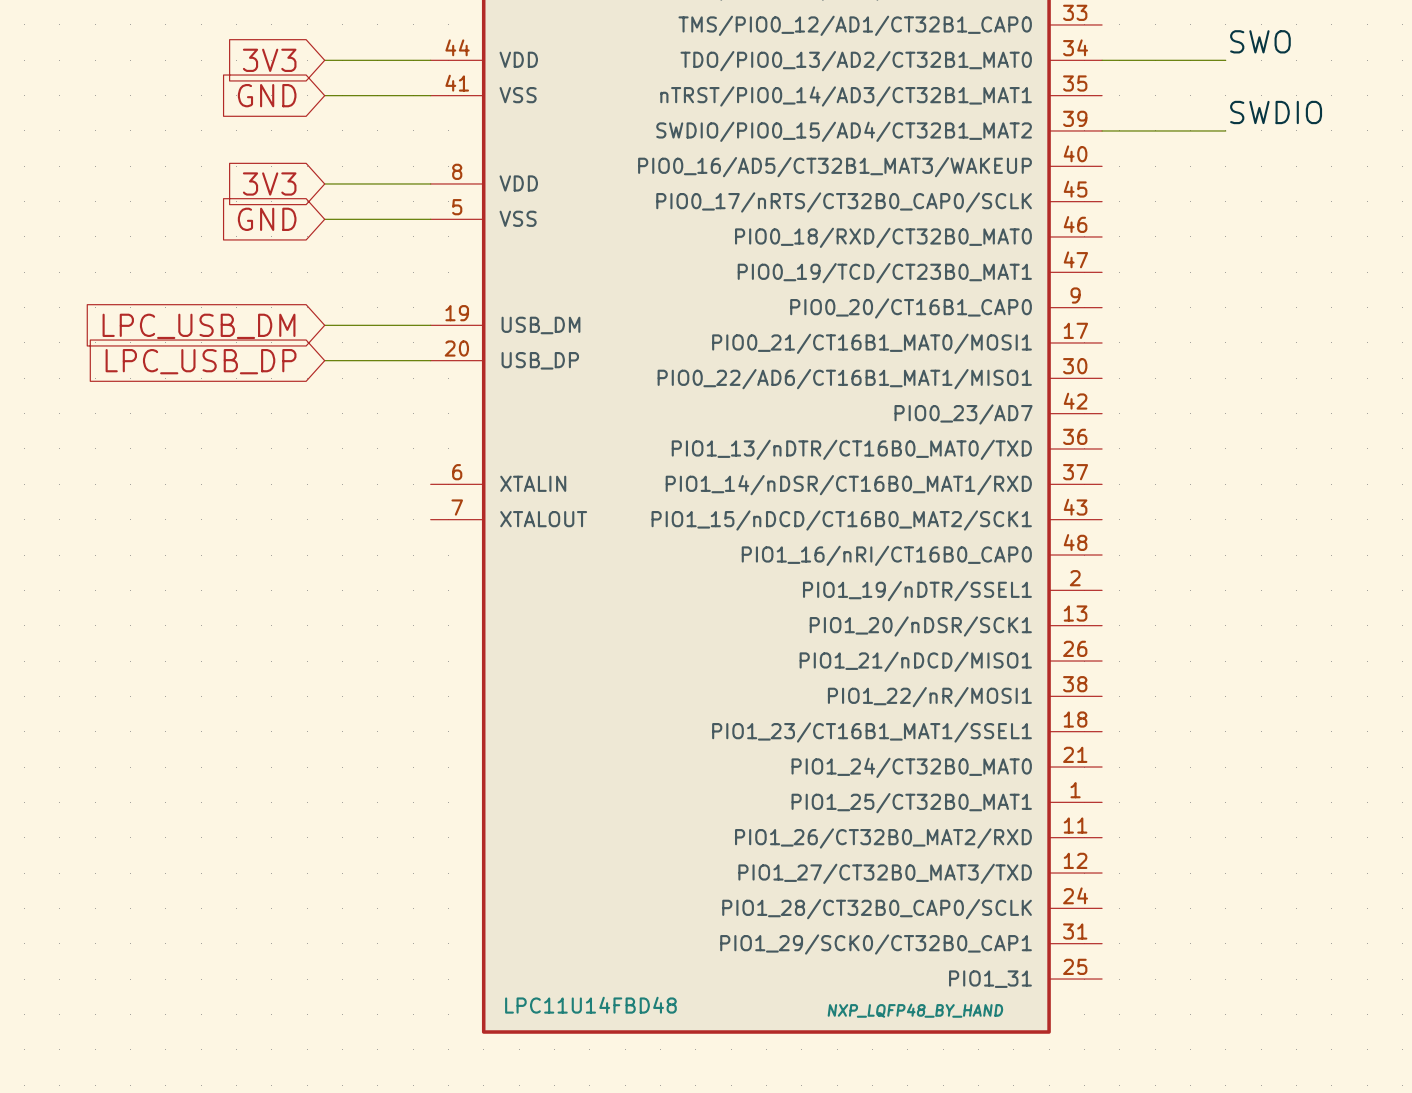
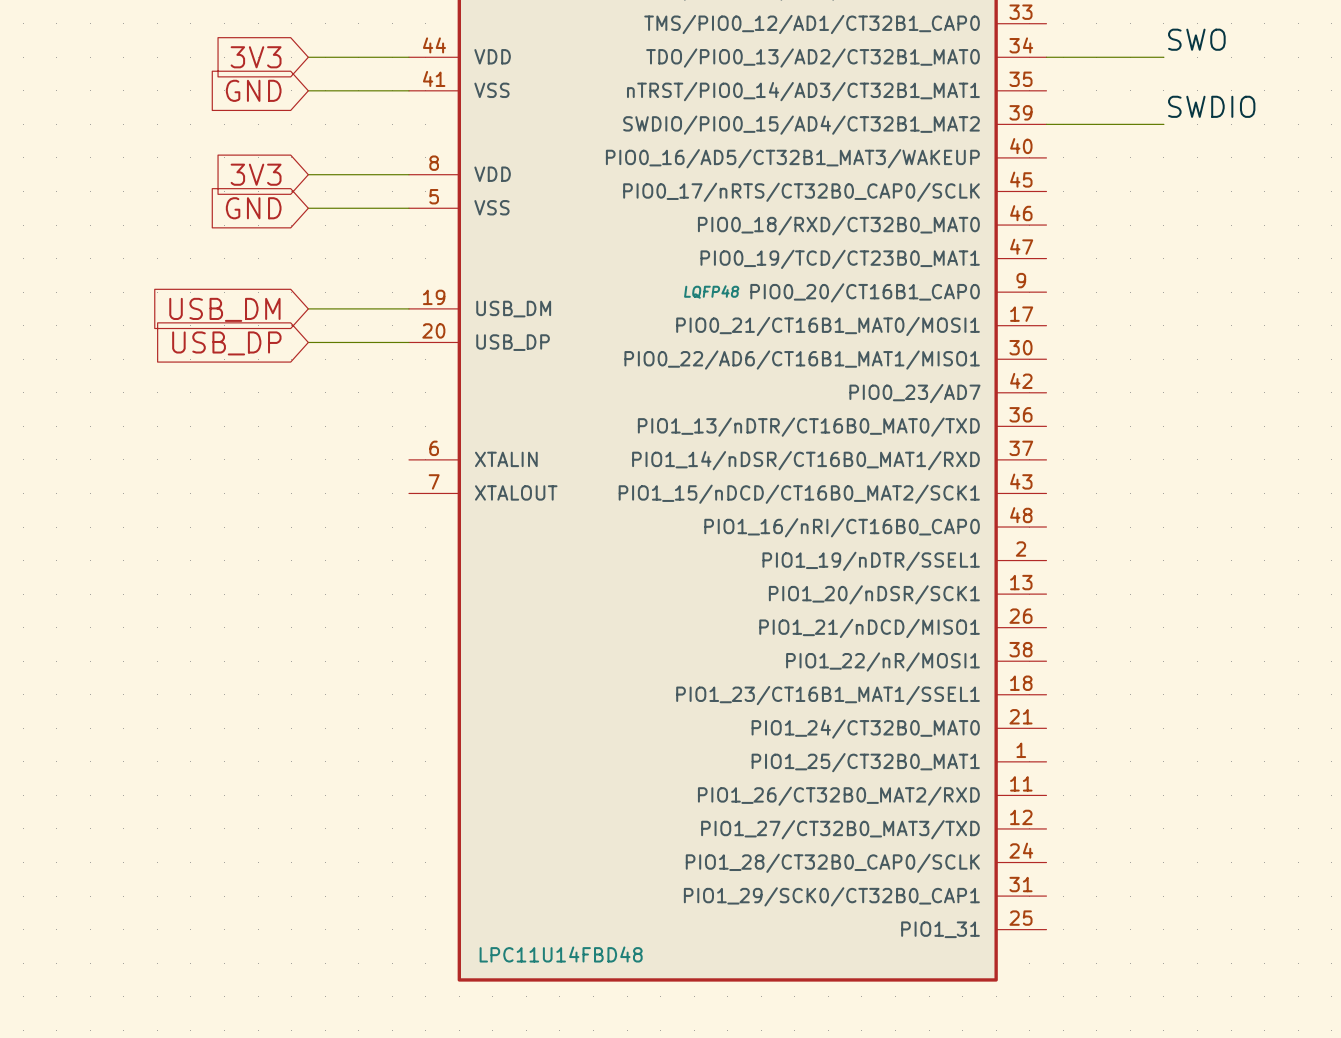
global label: LPC_USB_DM (199, 326) -> USB_DM (224, 309)
global label: LPC_USB_DP (201, 361) -> USB_DP (226, 343)
part text: NXP_LQFP48_BY_HAND (915, 1010) -> LQFP48 (711, 292)

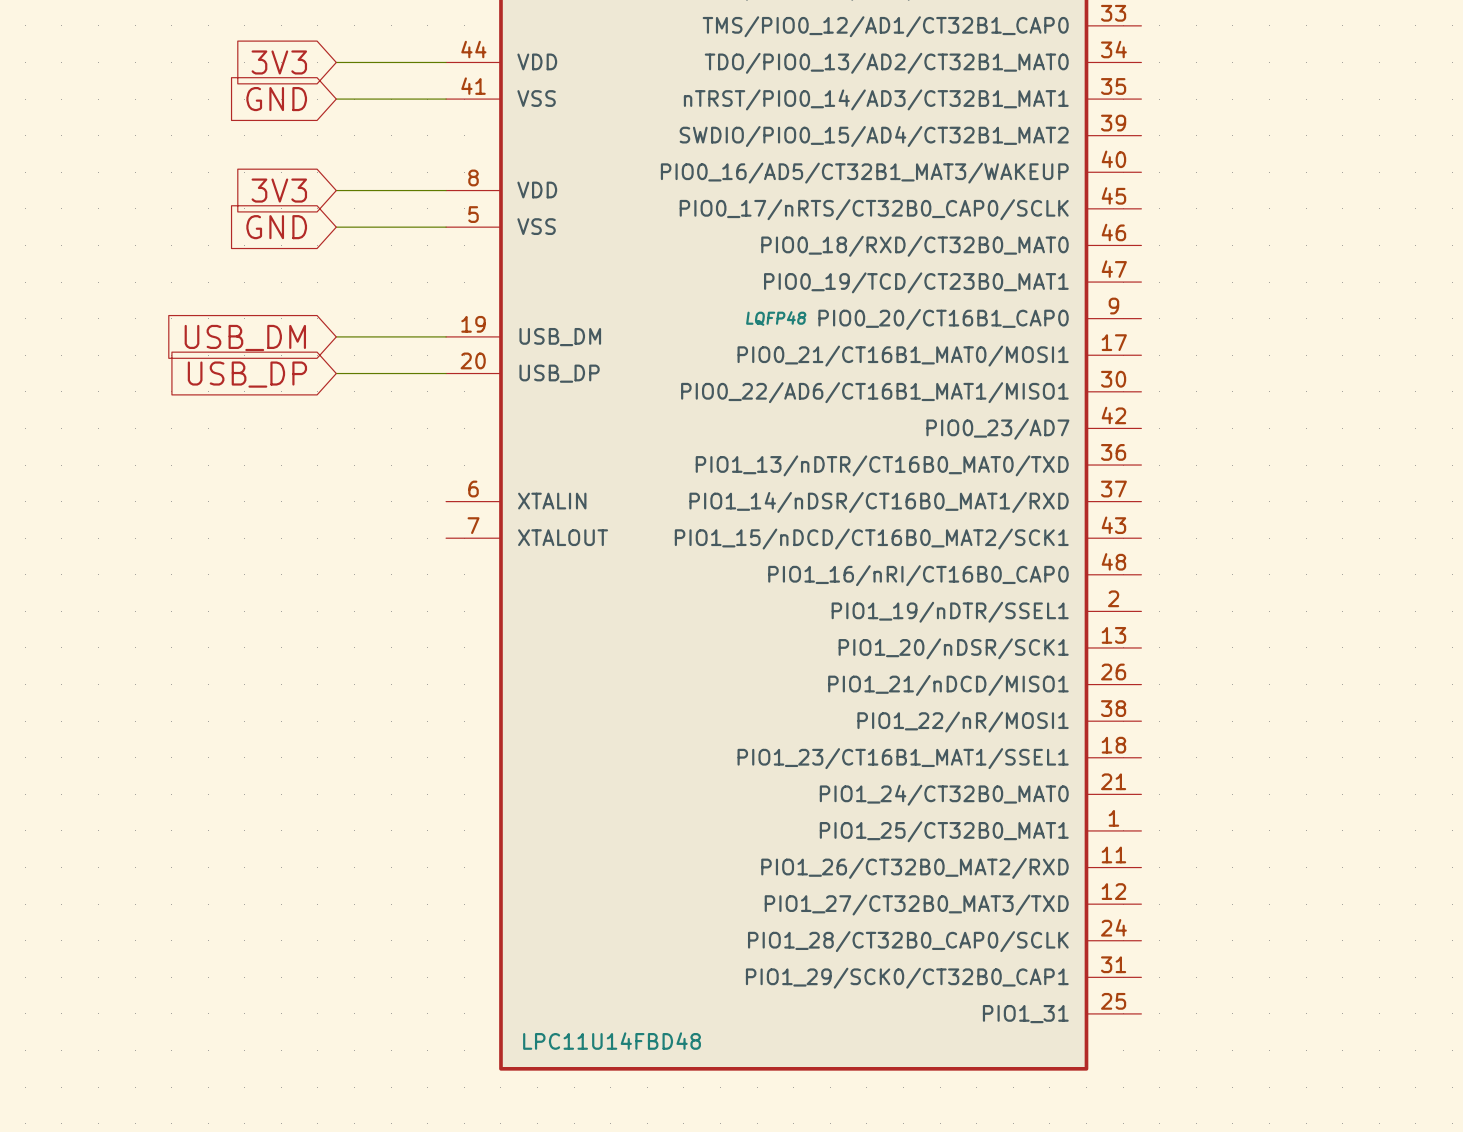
label: SWO (1196, 39) -> none
wire: (1046, 57) (1163, 57) -> none
label: SWDIO (1211, 106) -> none
wire: (1046, 124) (1163, 124) -> none

